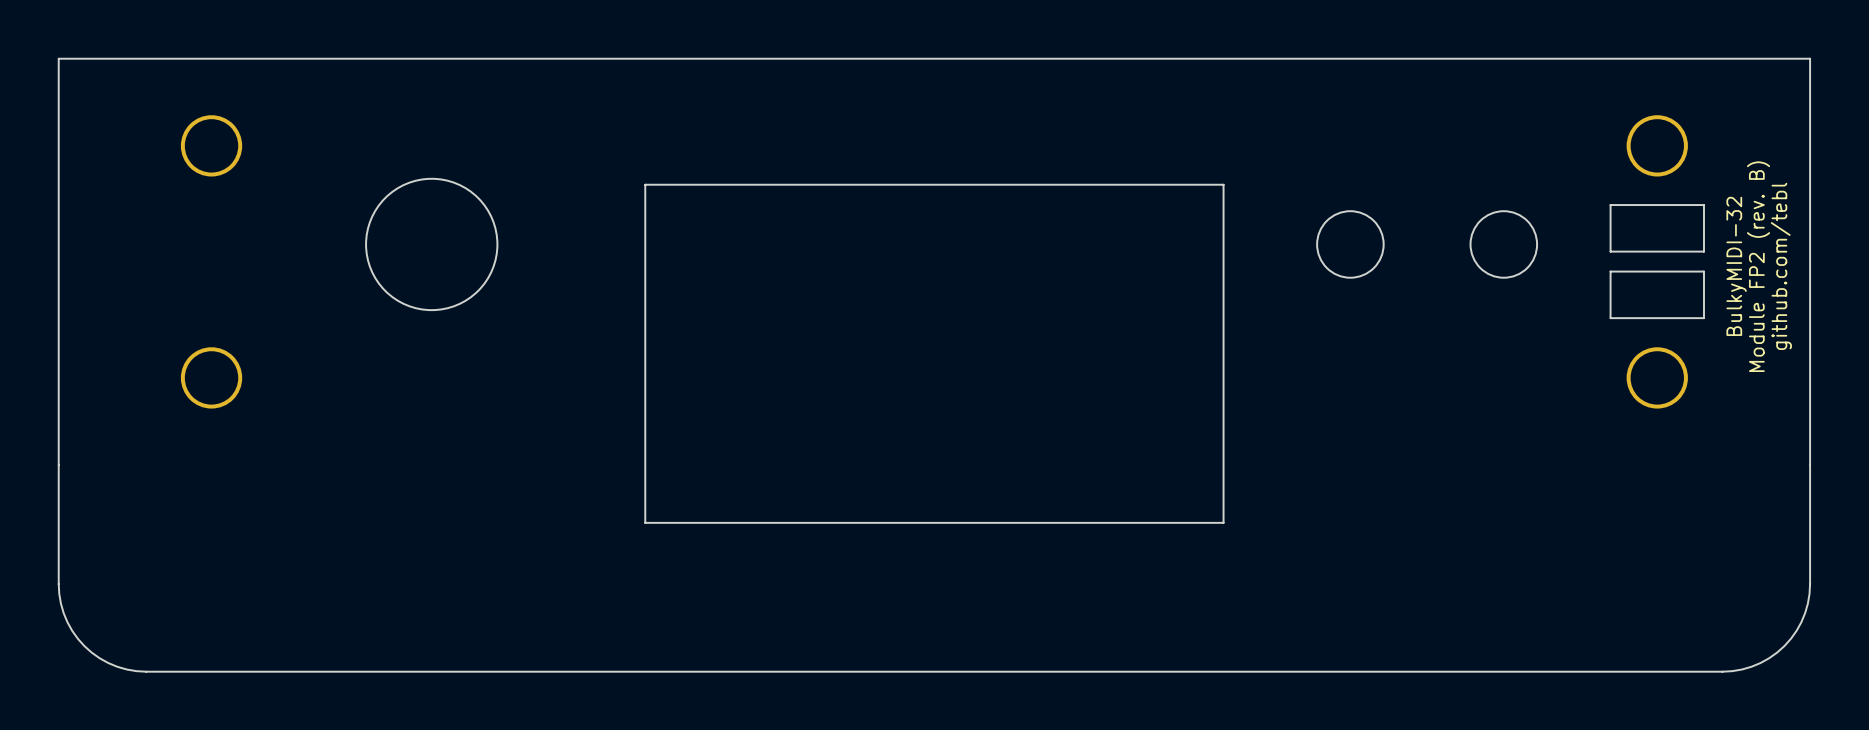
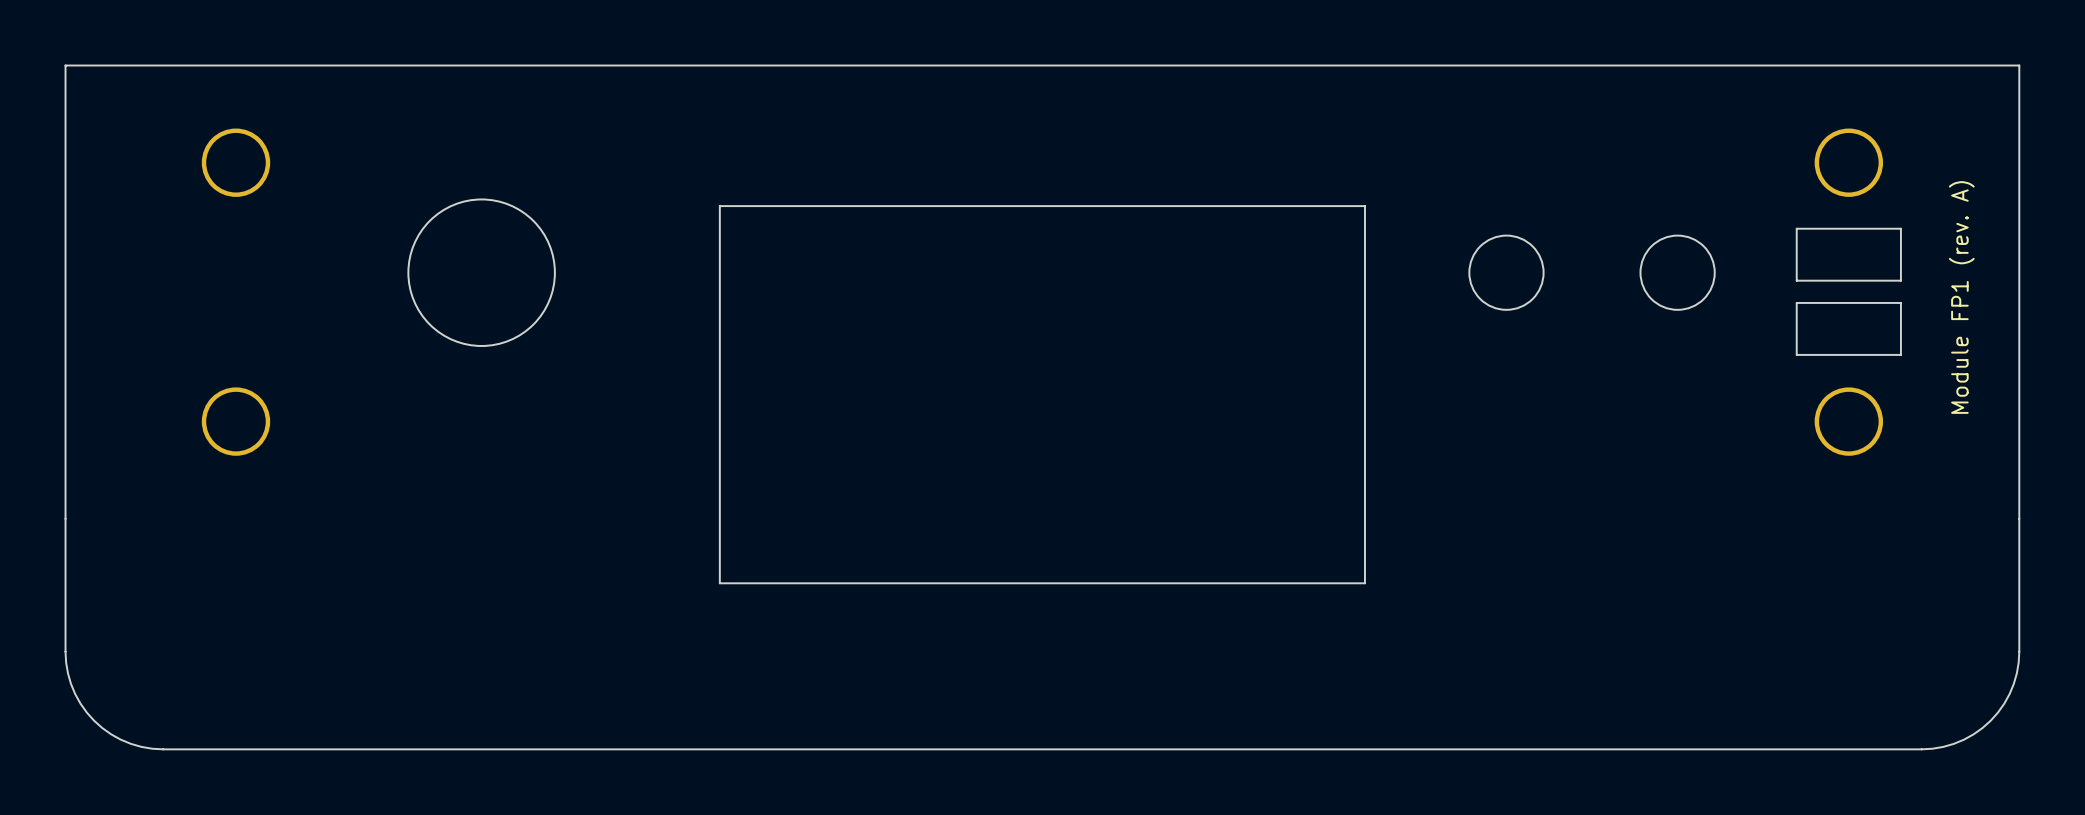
text: BulkyMIDI-32 (1736, 266) -> none
text: Module FP2 (rev. B) (1758, 266) -> Module FP1 (rev. A) (1961, 297)
text: github.com/tebl (1781, 266) -> none

